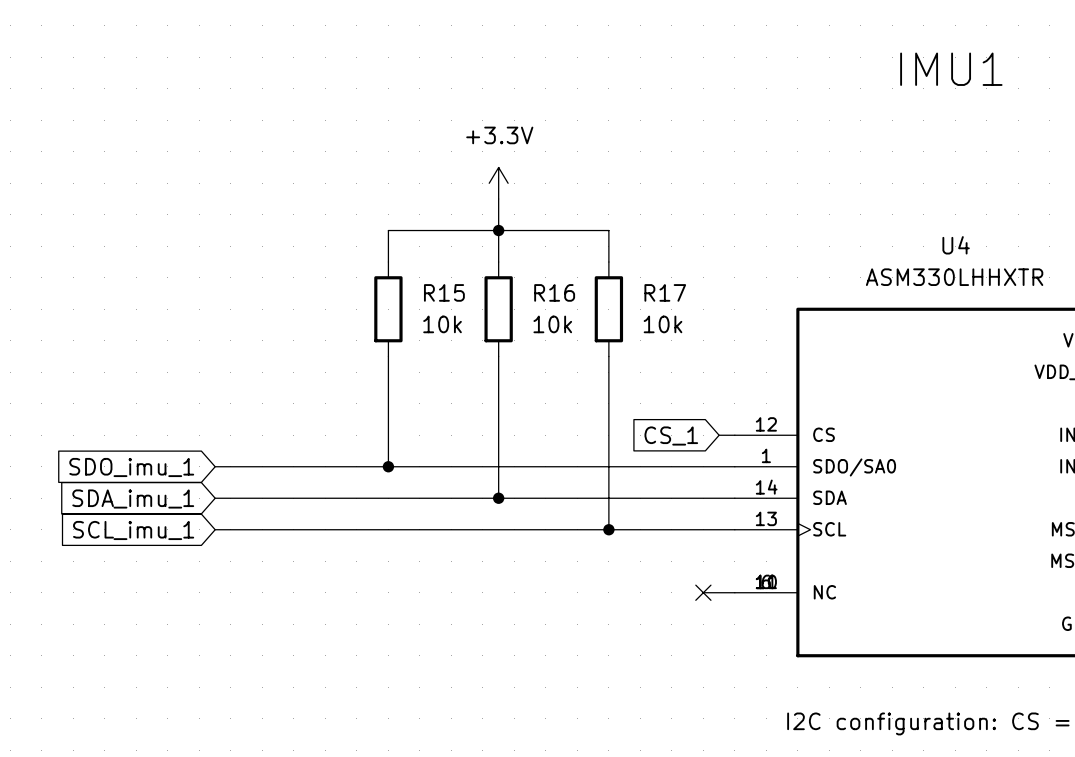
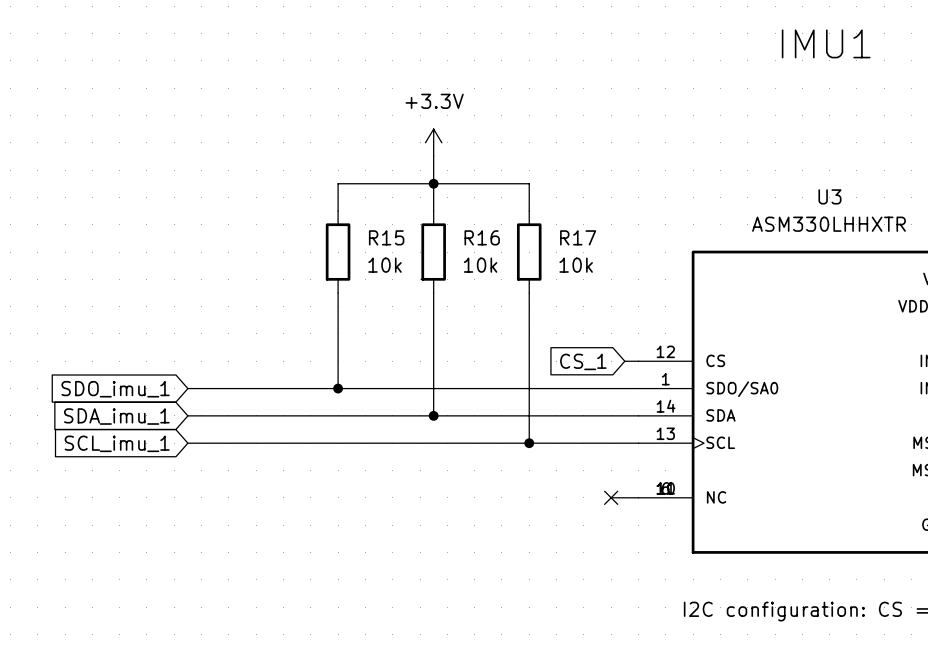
U4 name: U4 (956, 245) -> U3 (829, 196)

